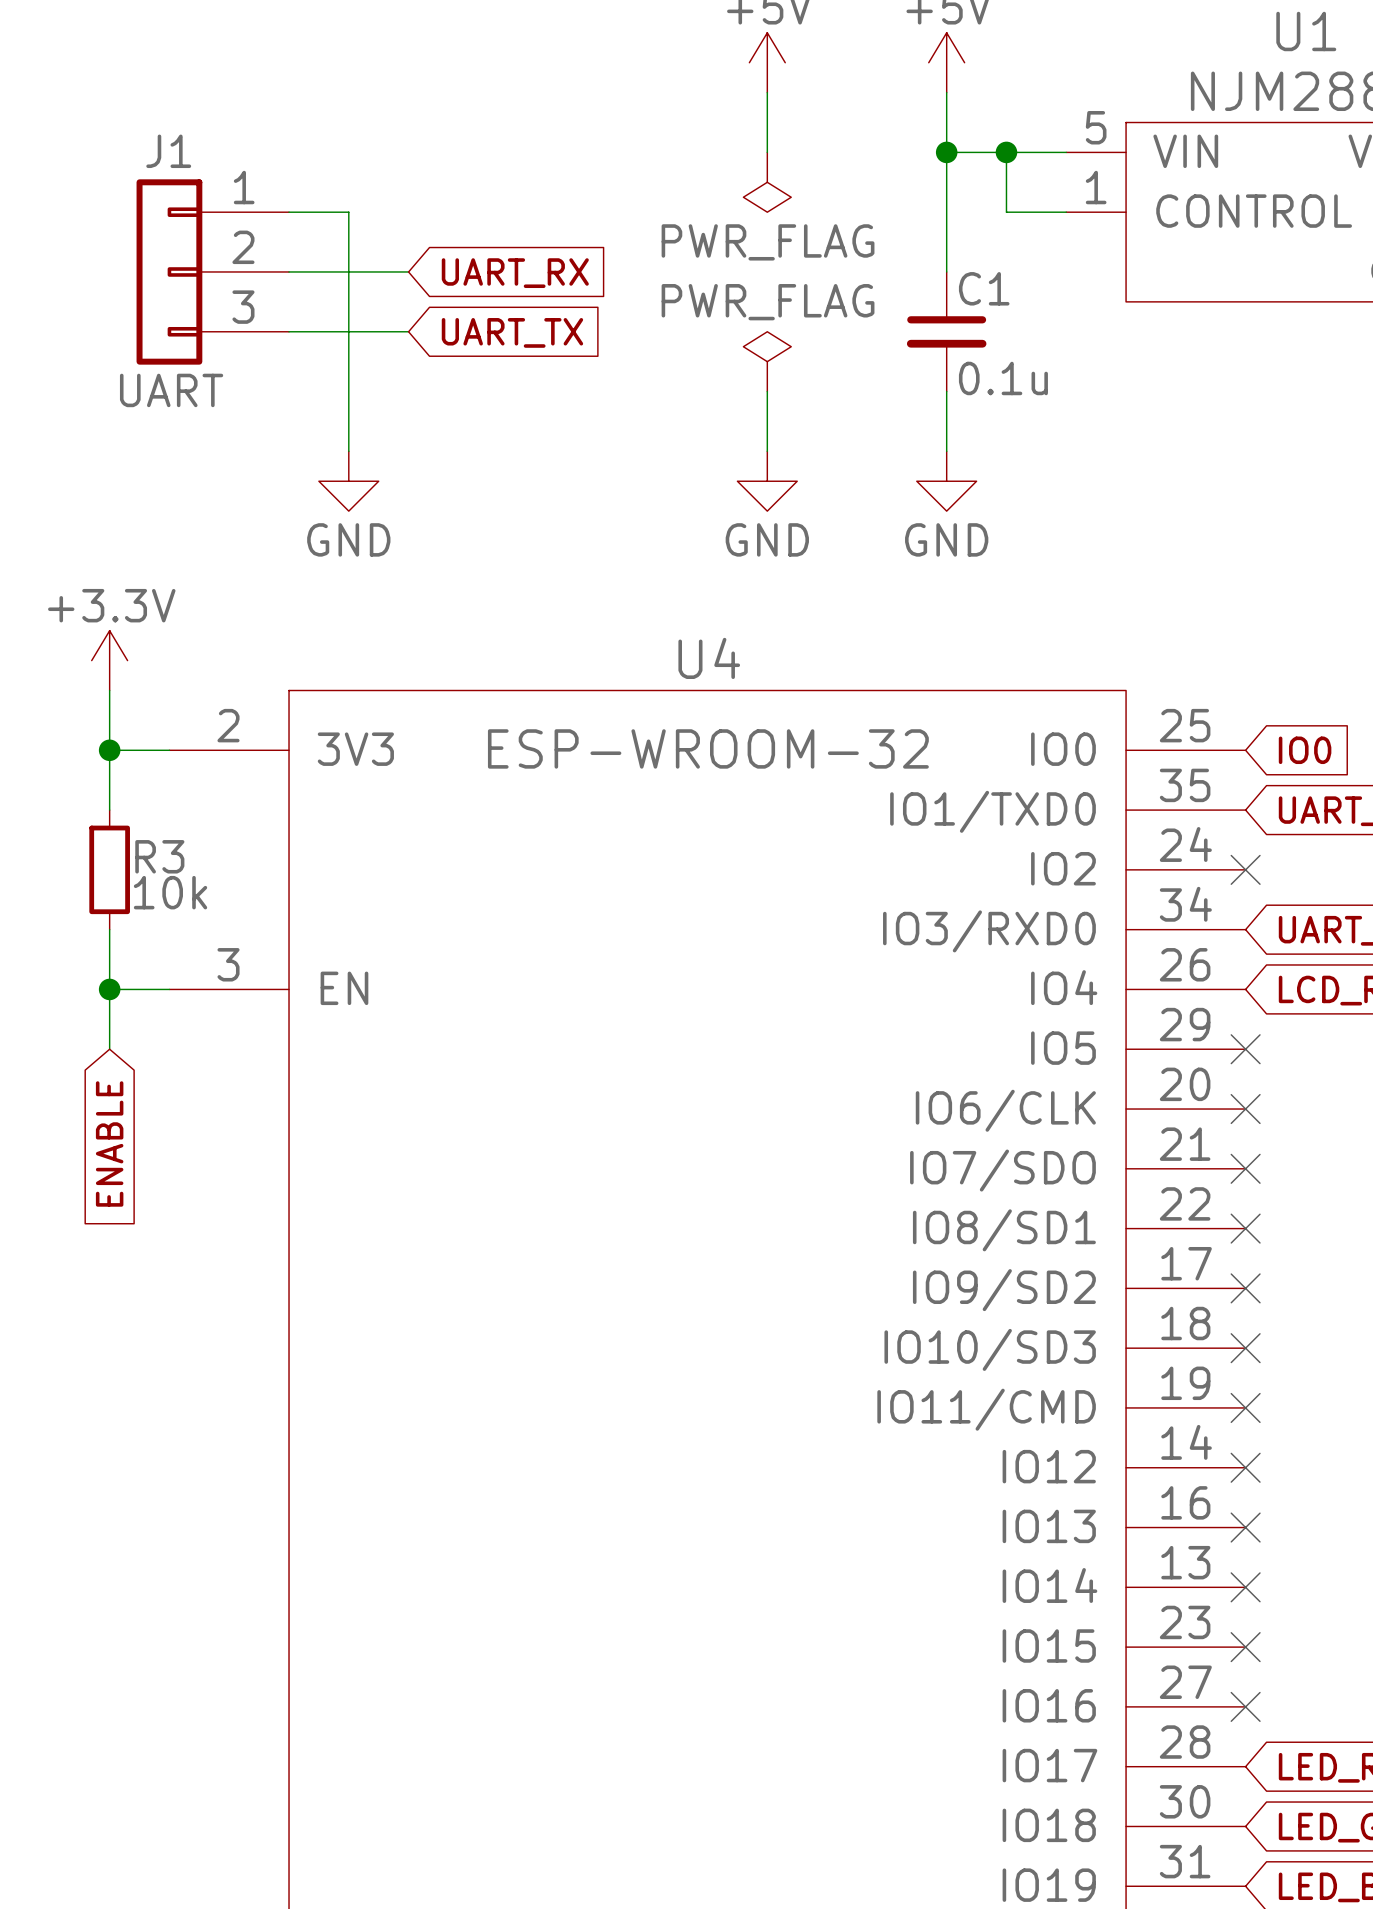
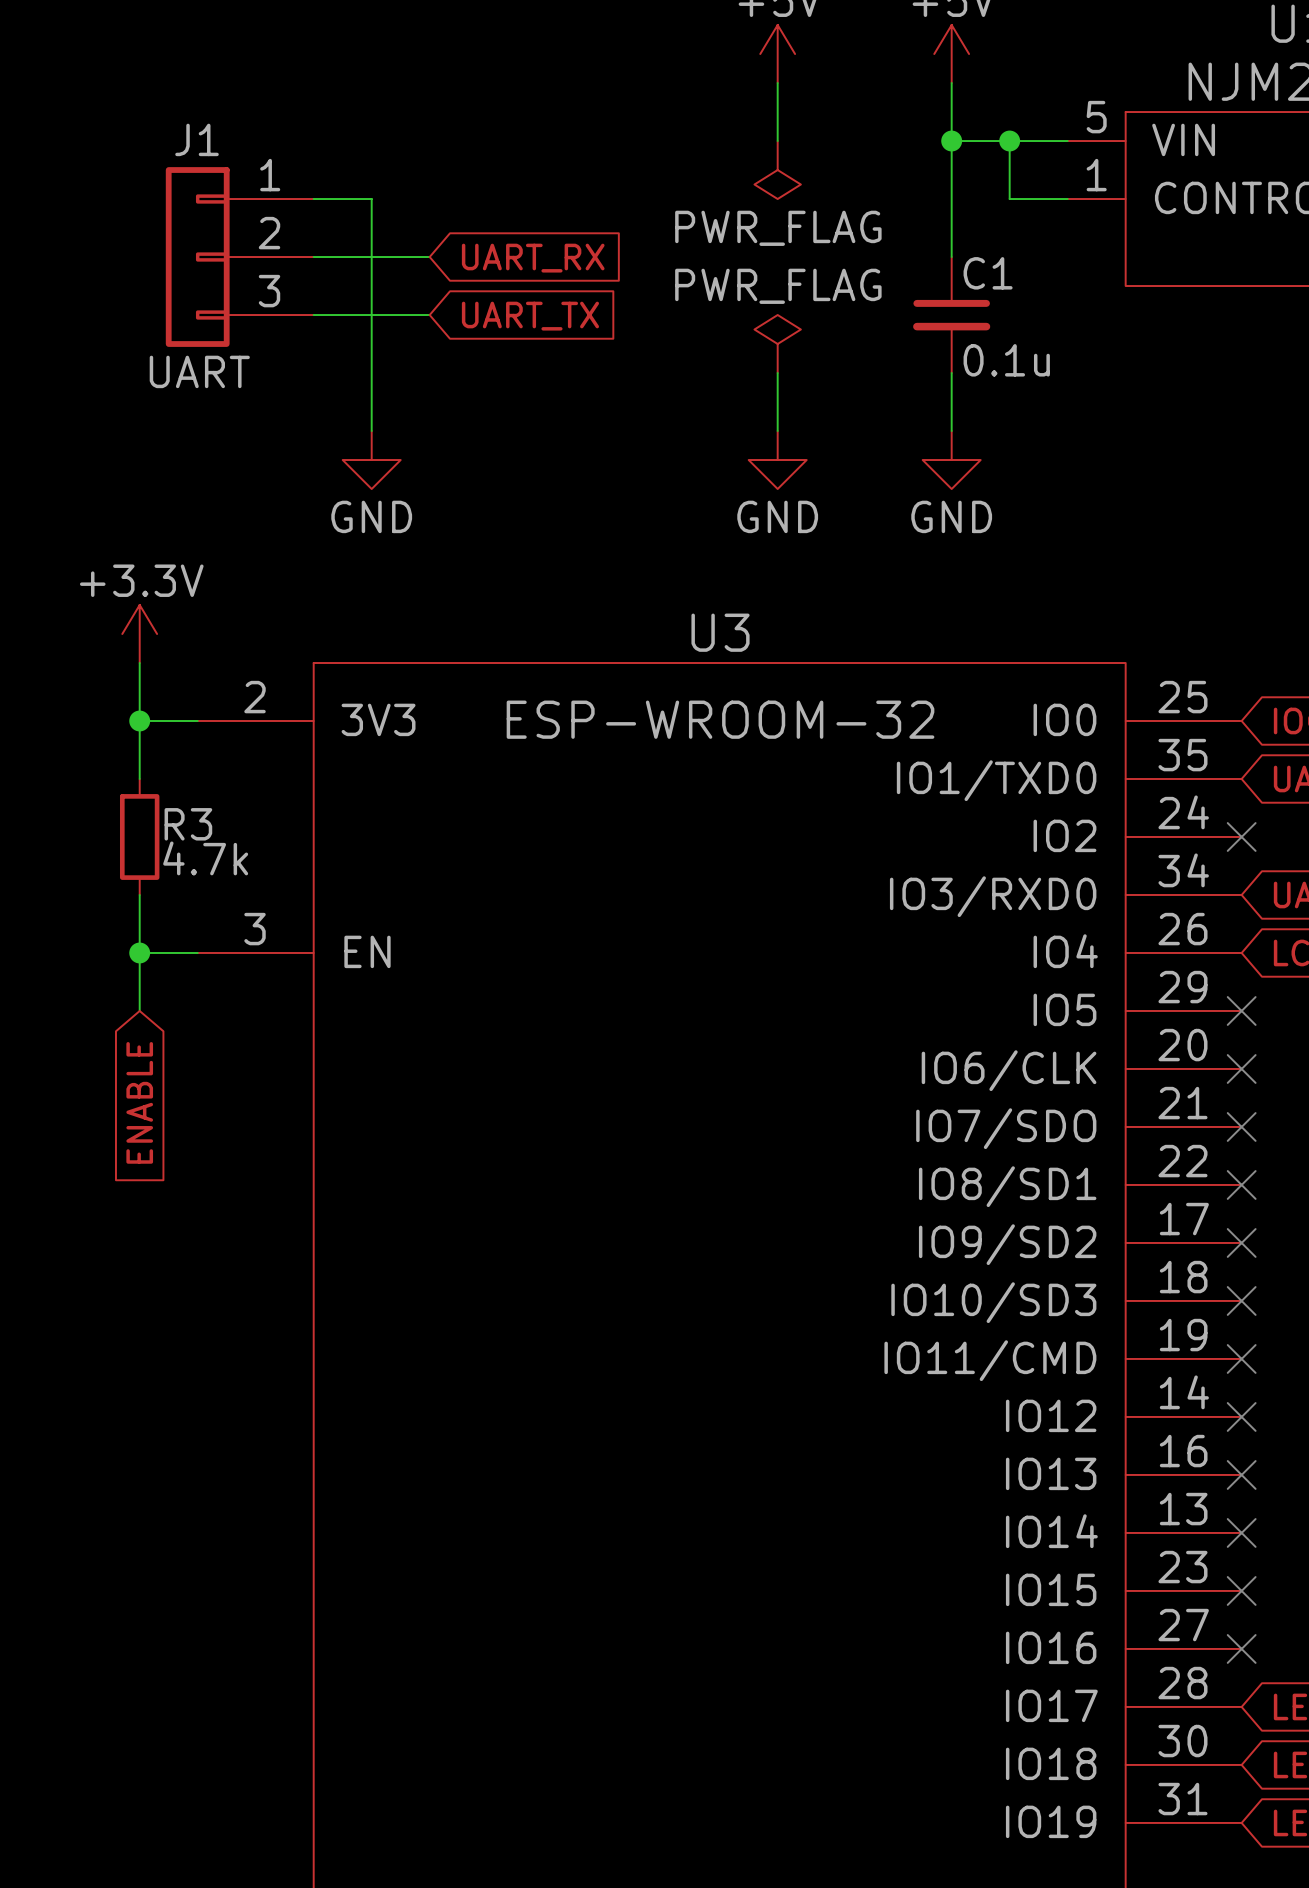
U4 name: U4 (709, 658) -> U3 (720, 632)
R3 value: 10k (170, 892) -> 4.7k (205, 858)

